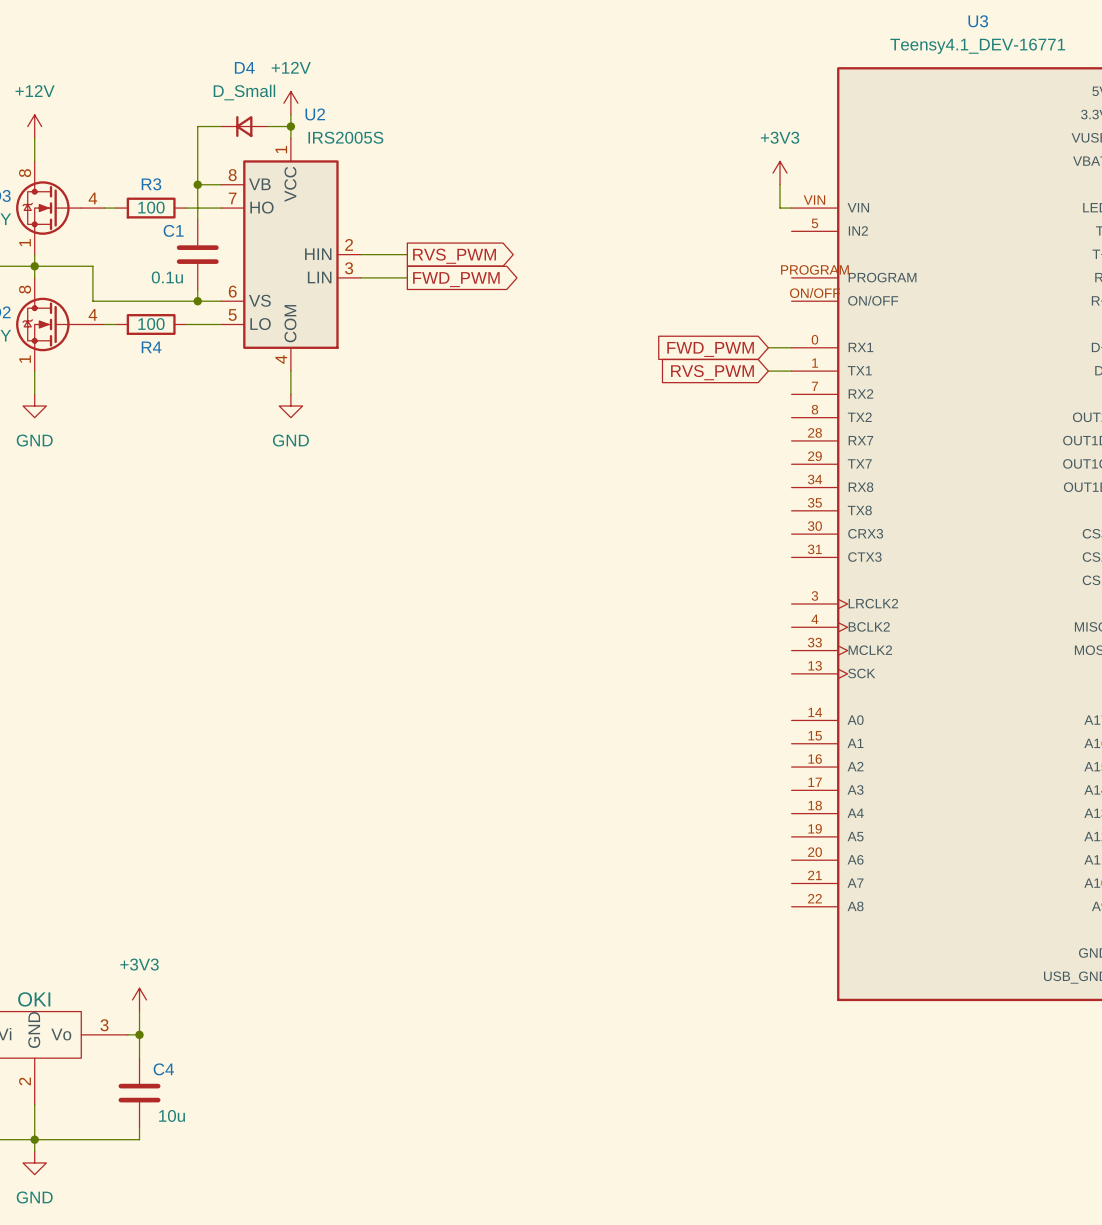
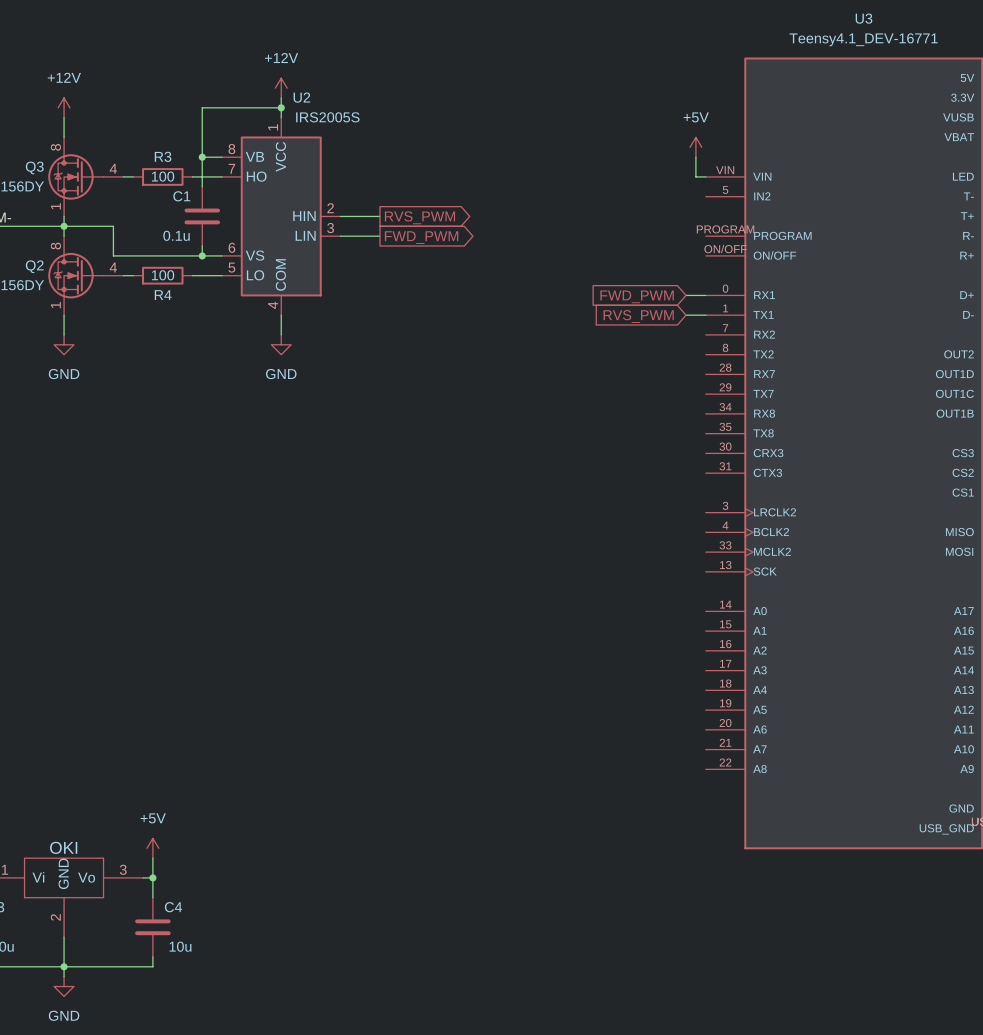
D4: D_Small (244, 126) -> none
power symbol: +3V3 (780, 173) -> +5V (695, 147)
power symbol: +3V3 (139, 999) -> +5V (152, 848)

